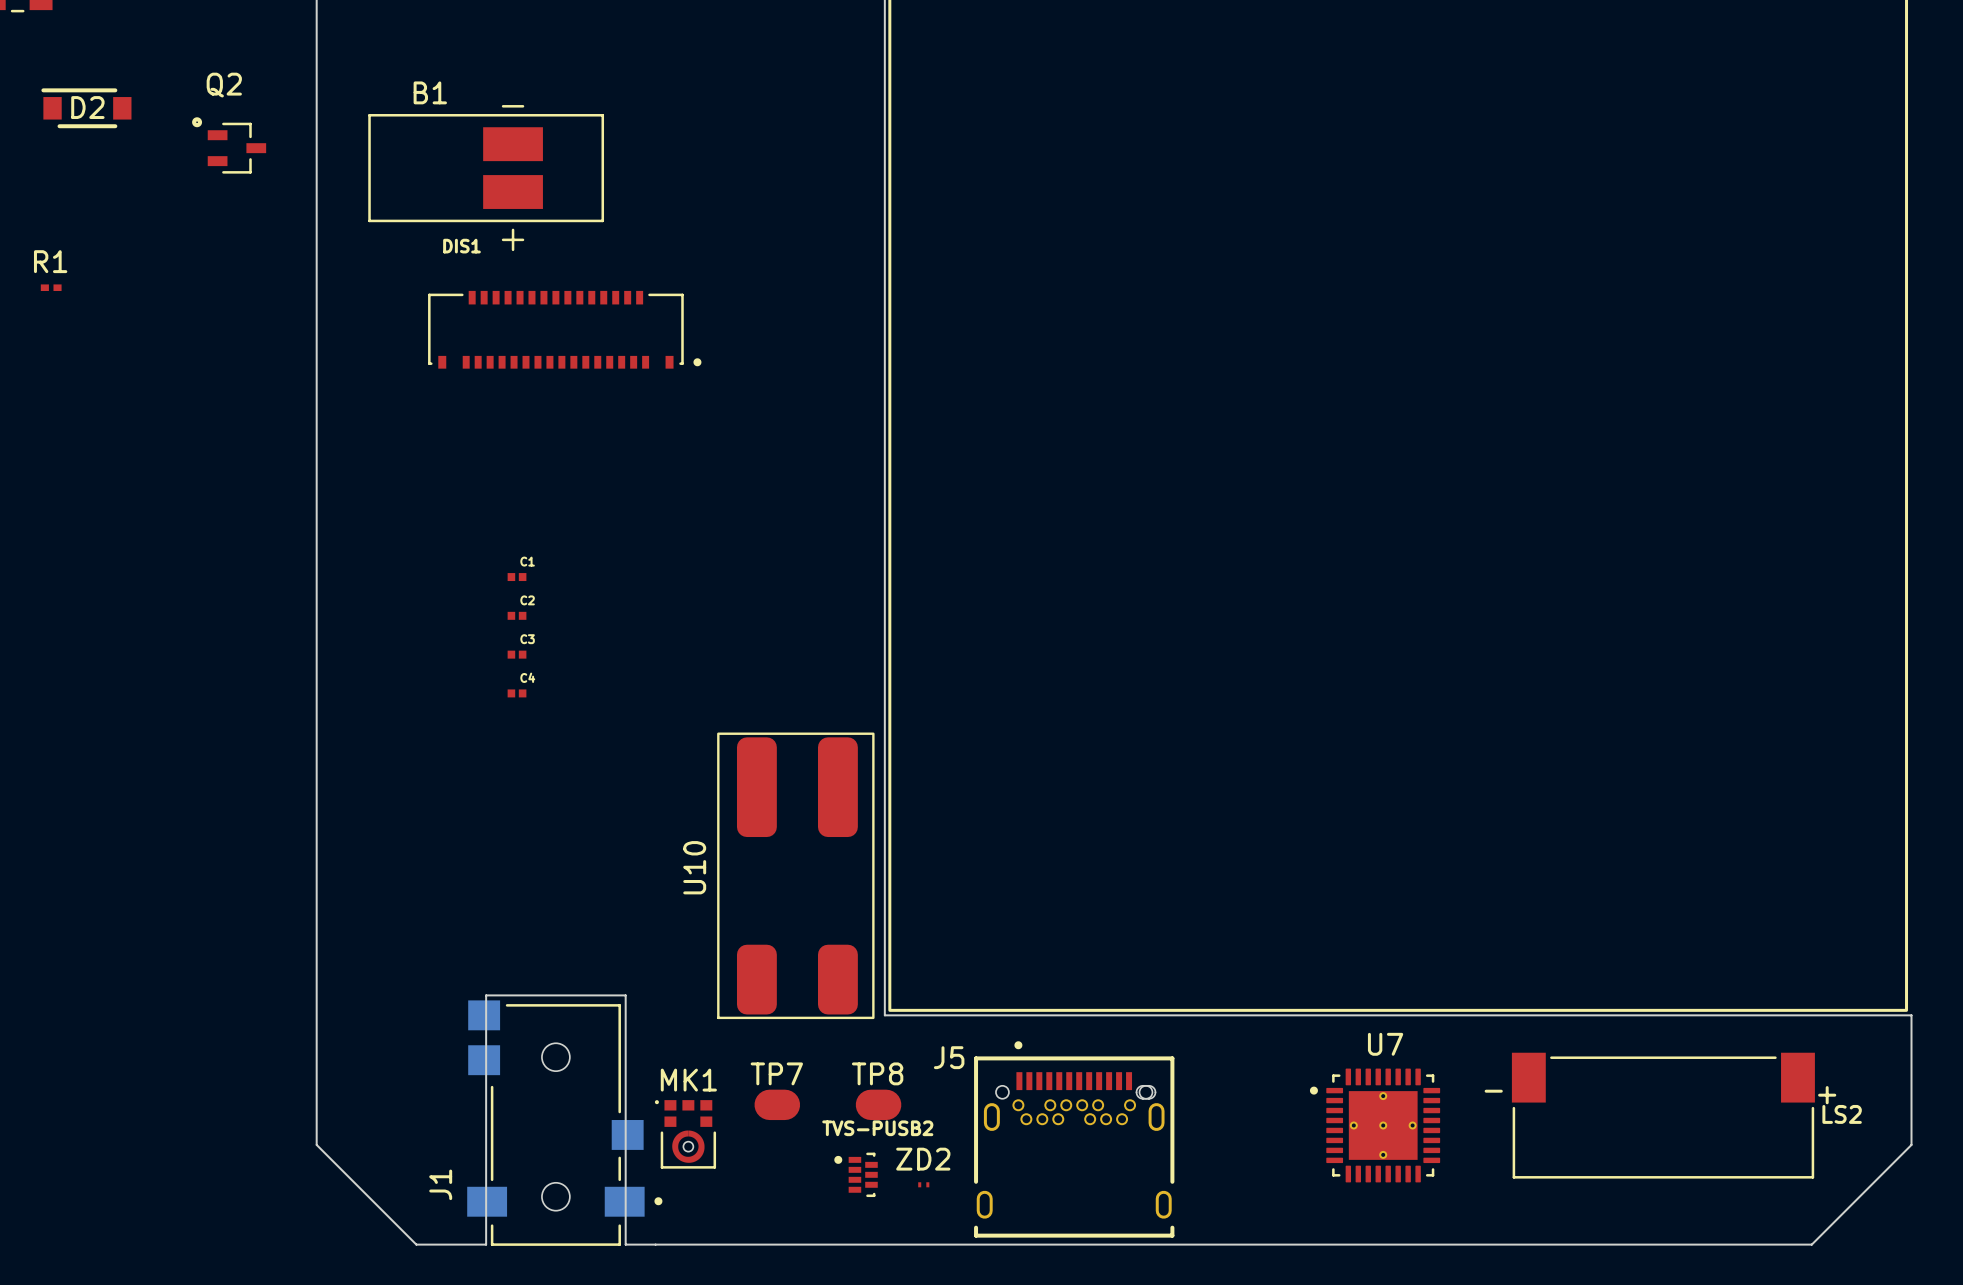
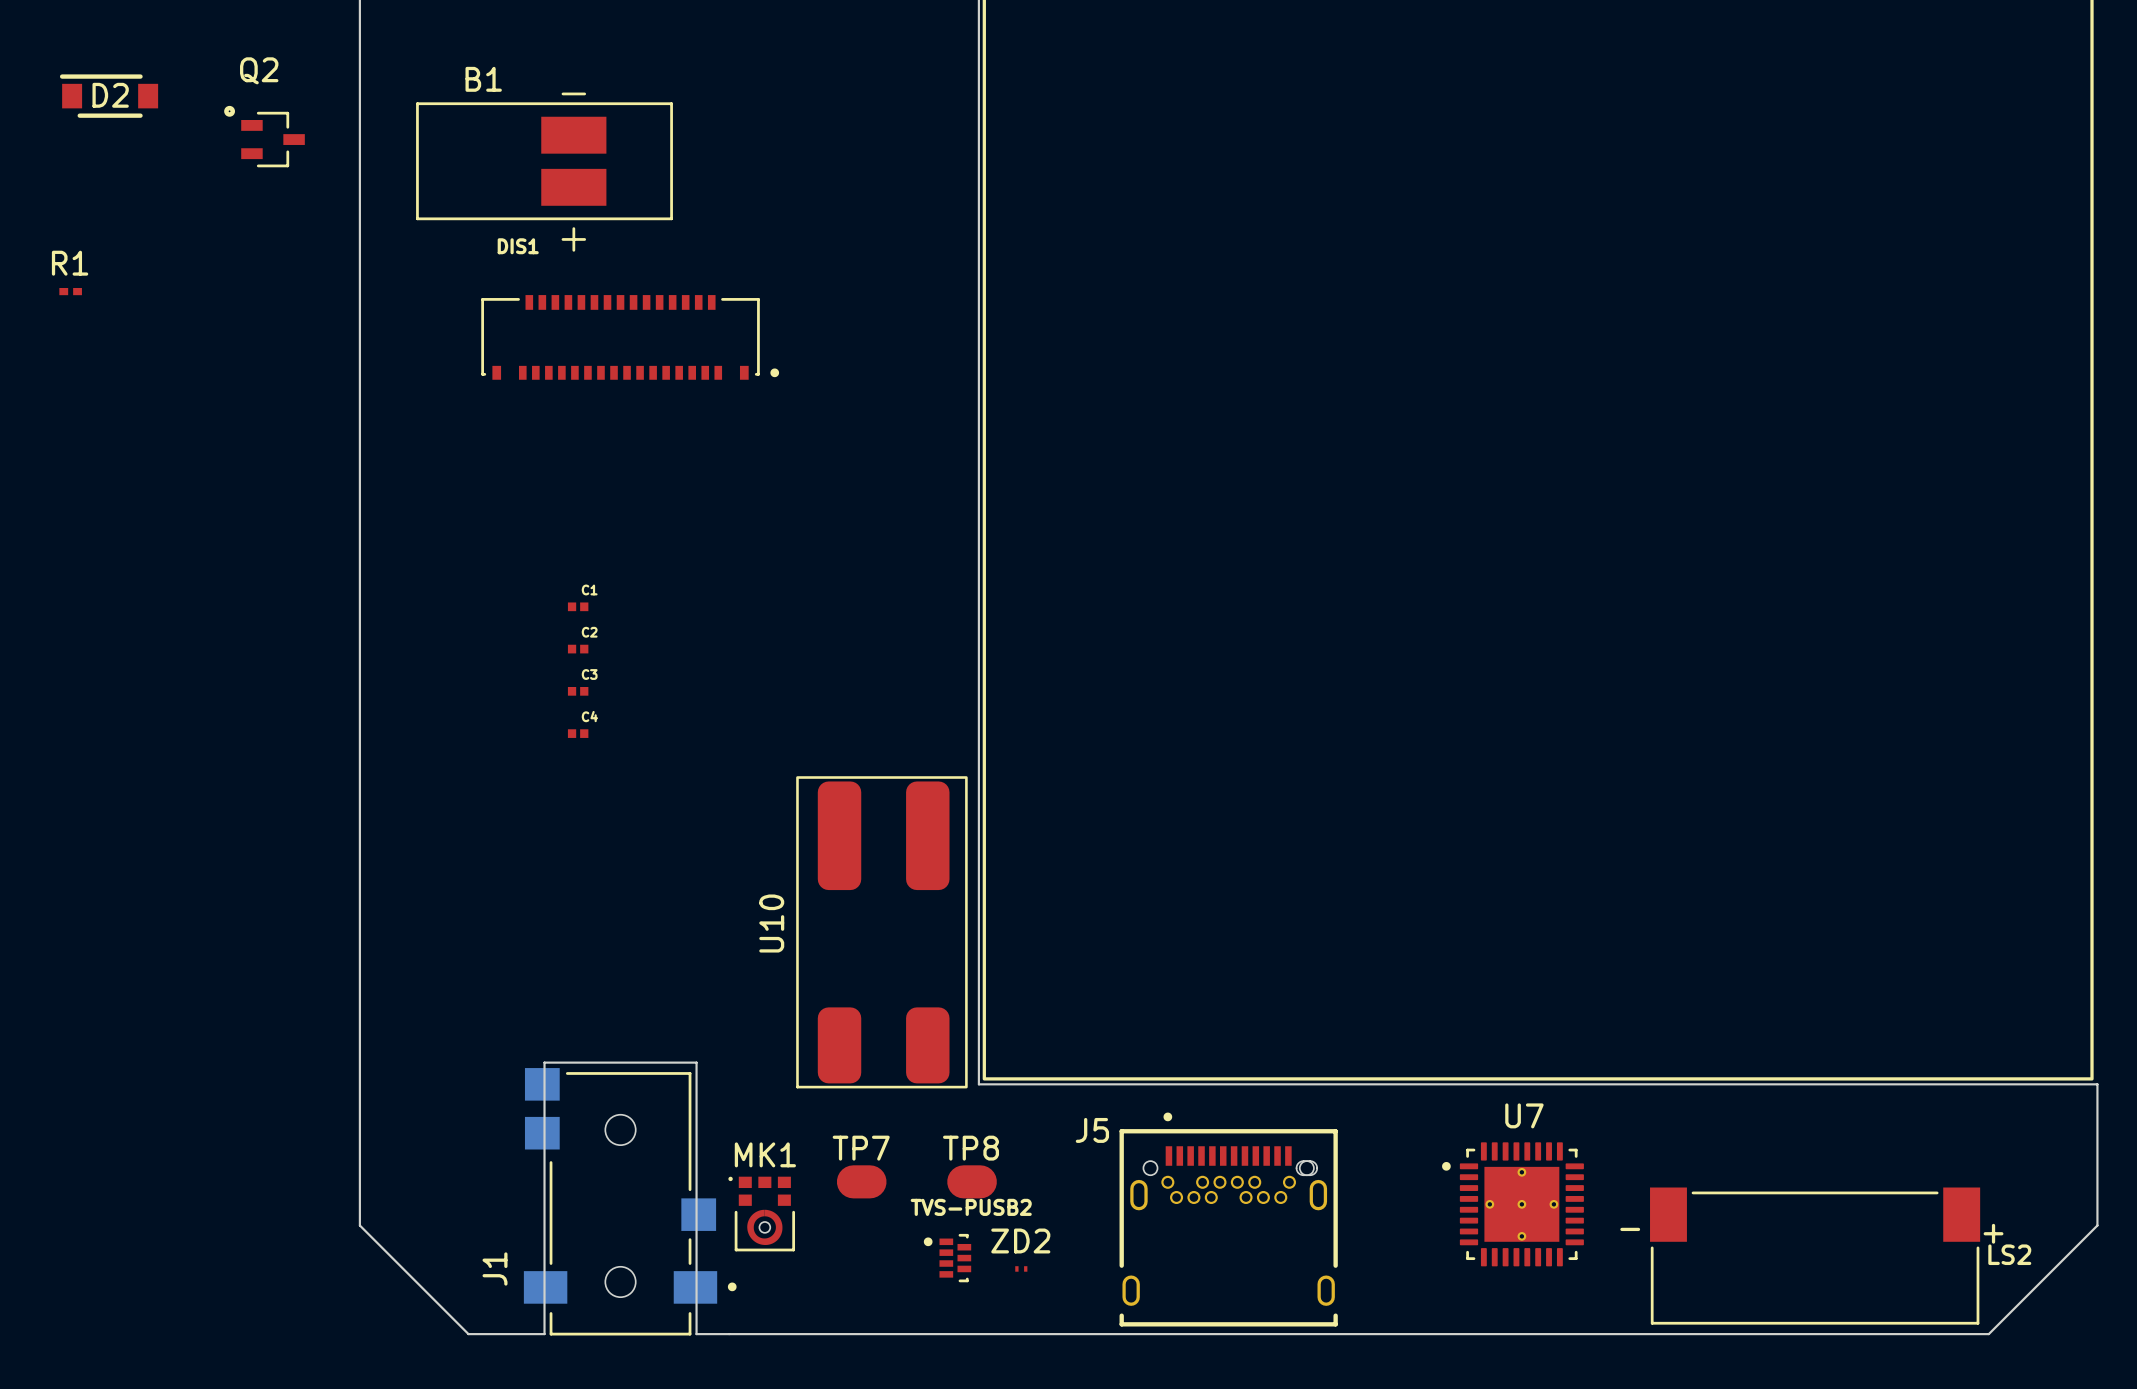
LS2 position: (1663, 1115) -> (1815, 1256)
J5 position: (1074, 1139) -> (1228, 1219)

